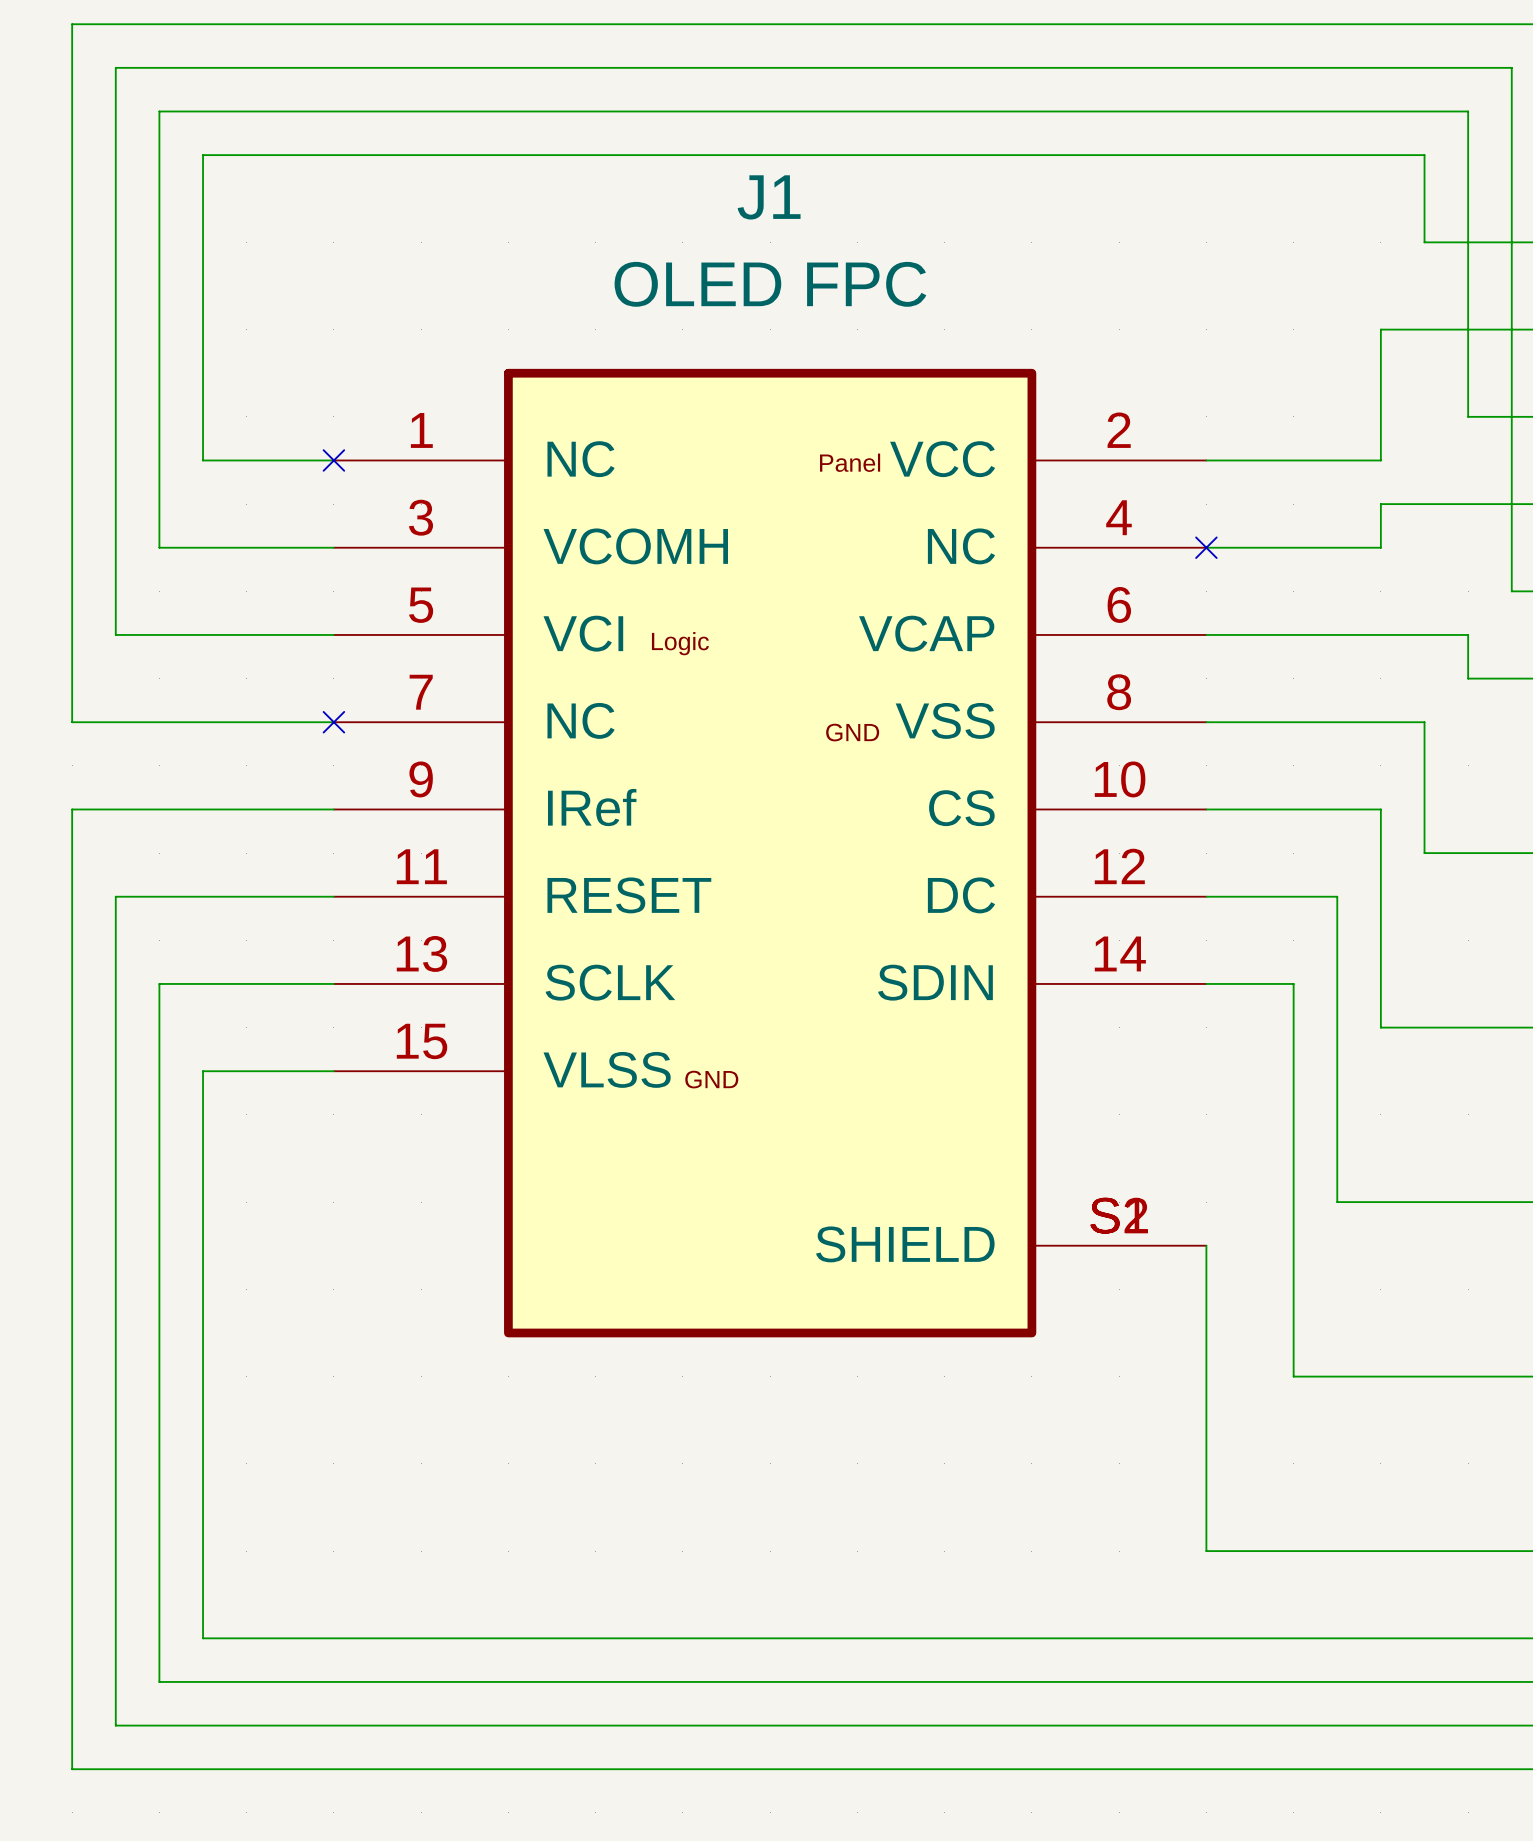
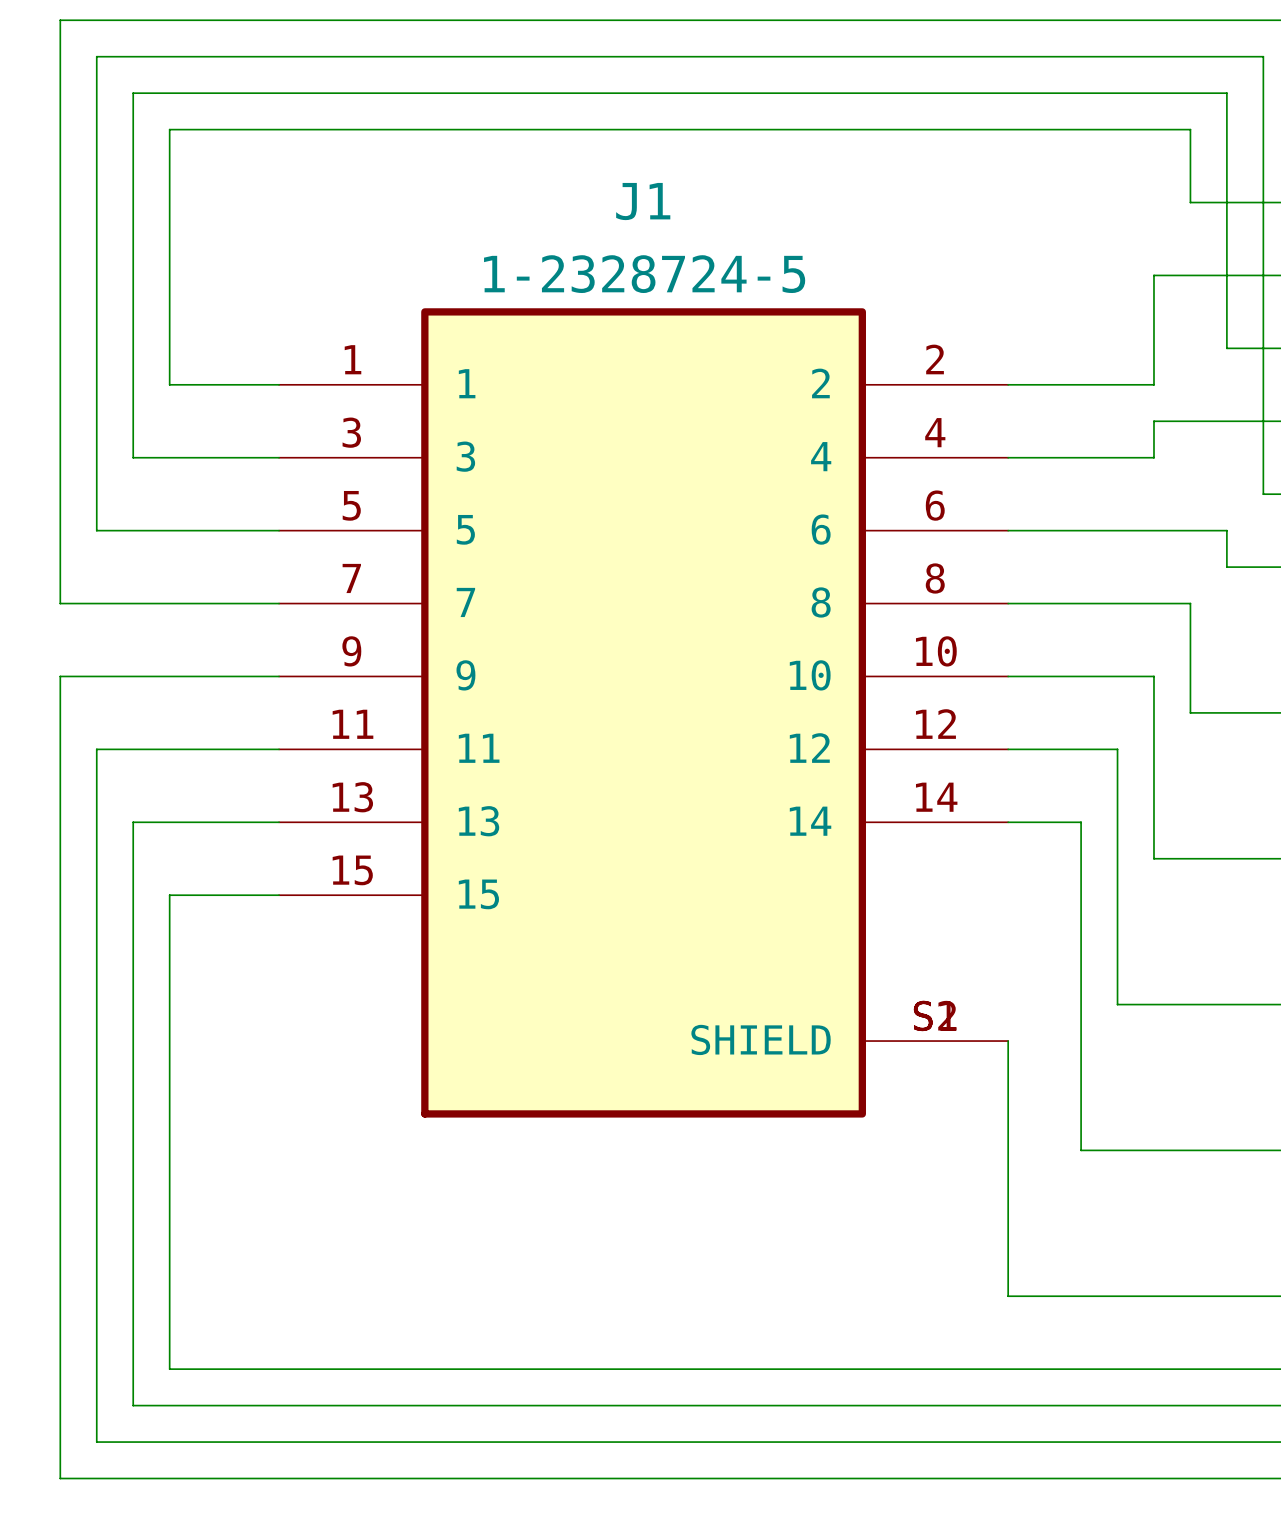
J1 value: OLED FPC (770, 284) -> 1-2328724-5 (644, 274)
J1 symbol: [323, 368, 1217, 1338] -> [279, 308, 1009, 1118]

